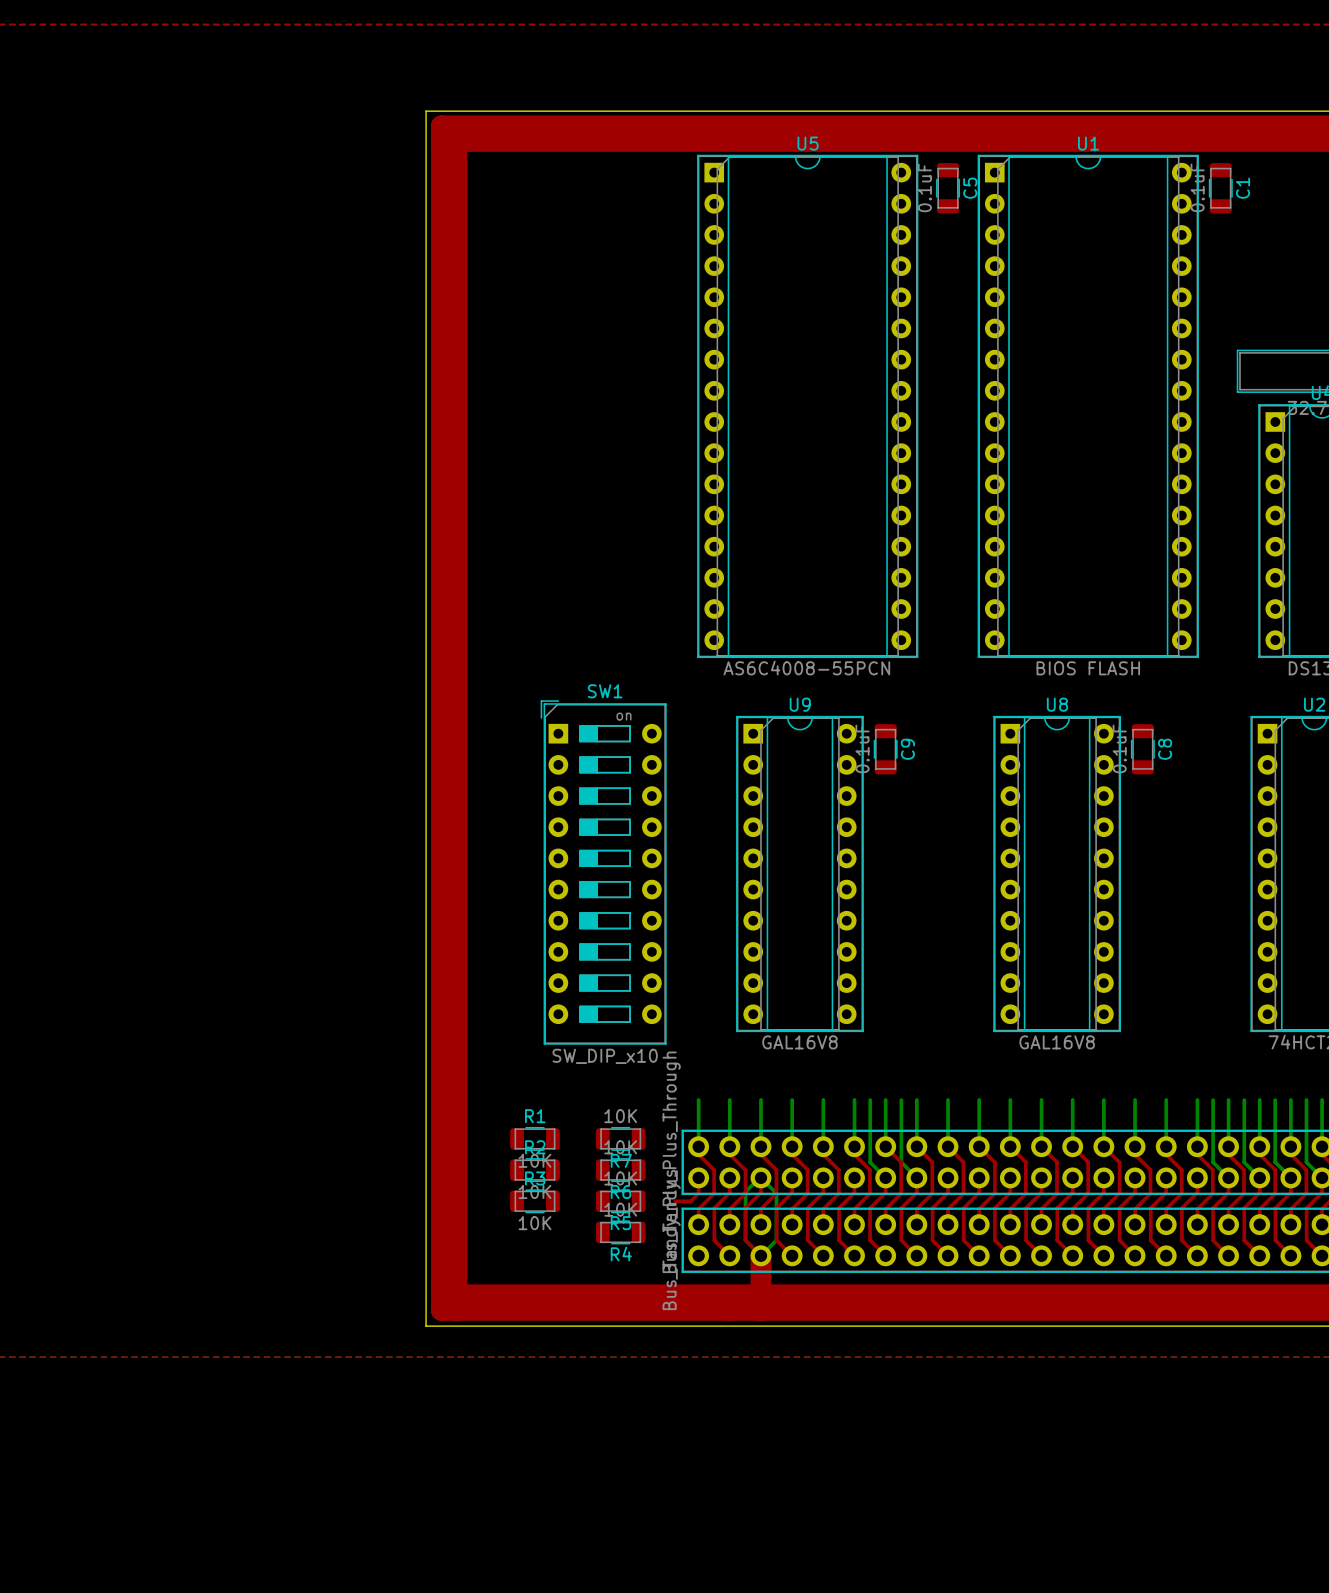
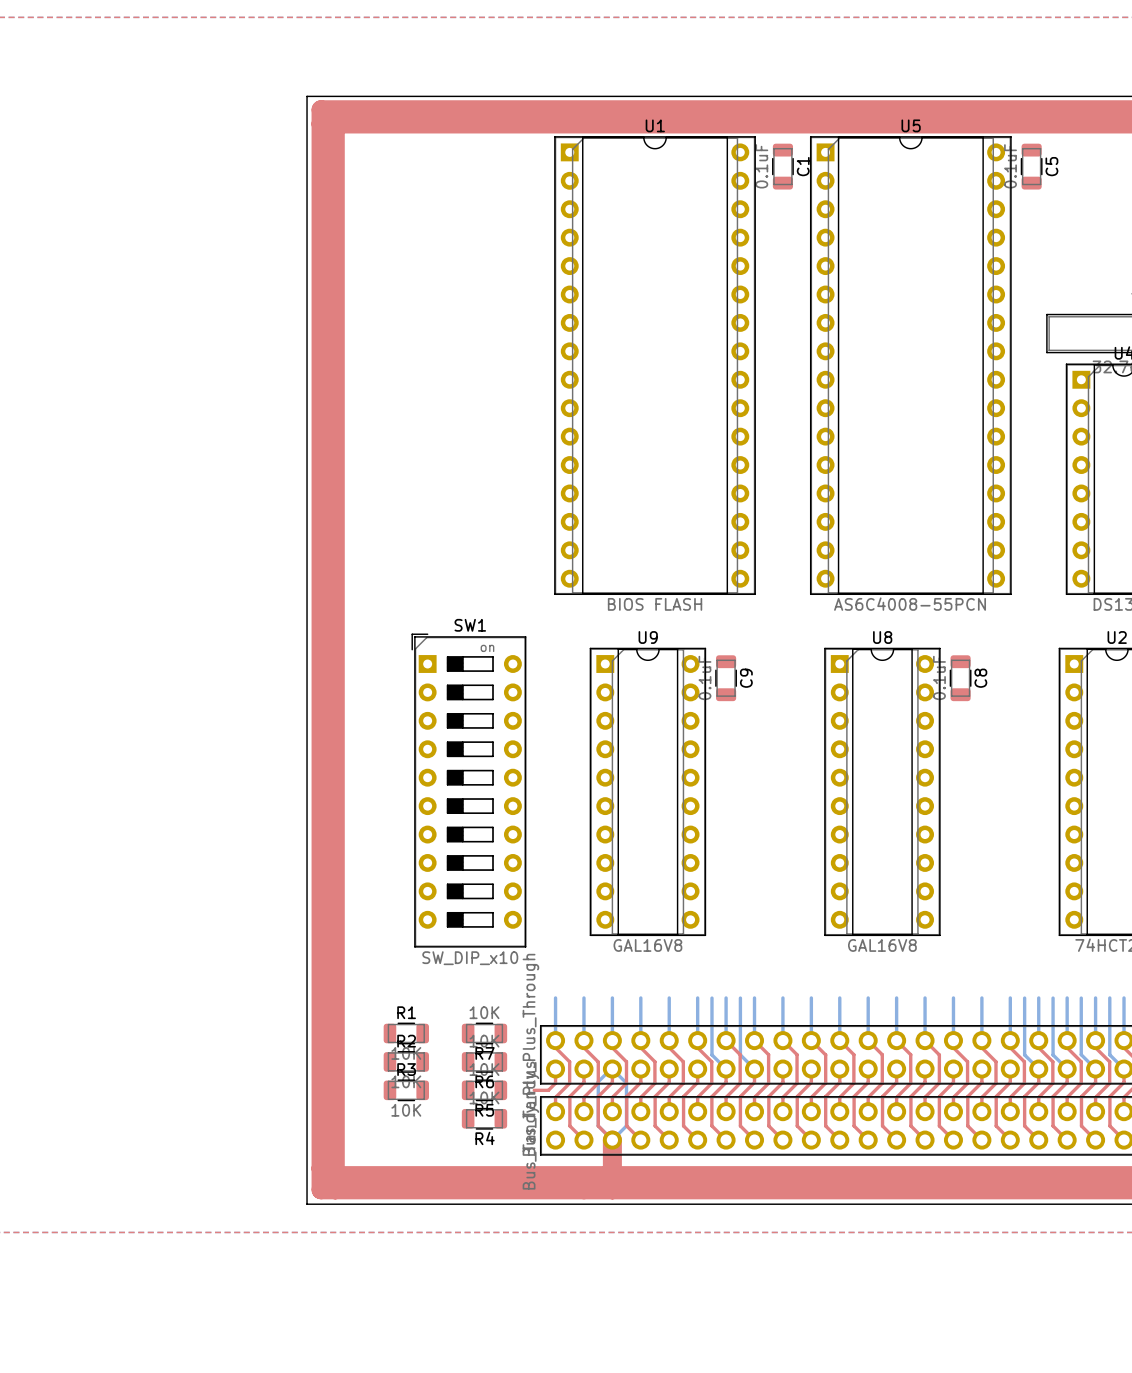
U5 name: U5 (808, 143) -> U1 (655, 125)
U1 name: U1 (1088, 143) -> U5 (911, 125)
C5 name: C5 (970, 188) -> C1 (803, 166)
C1 name: C1 (1243, 188) -> C5 (1051, 166)
U5 value: AS6C4008-55PCN (806, 668) -> BIOS FLASH (655, 604)
U1 value: BIOS FLASH (1088, 668) -> AS6C4008-55PCN (910, 604)

